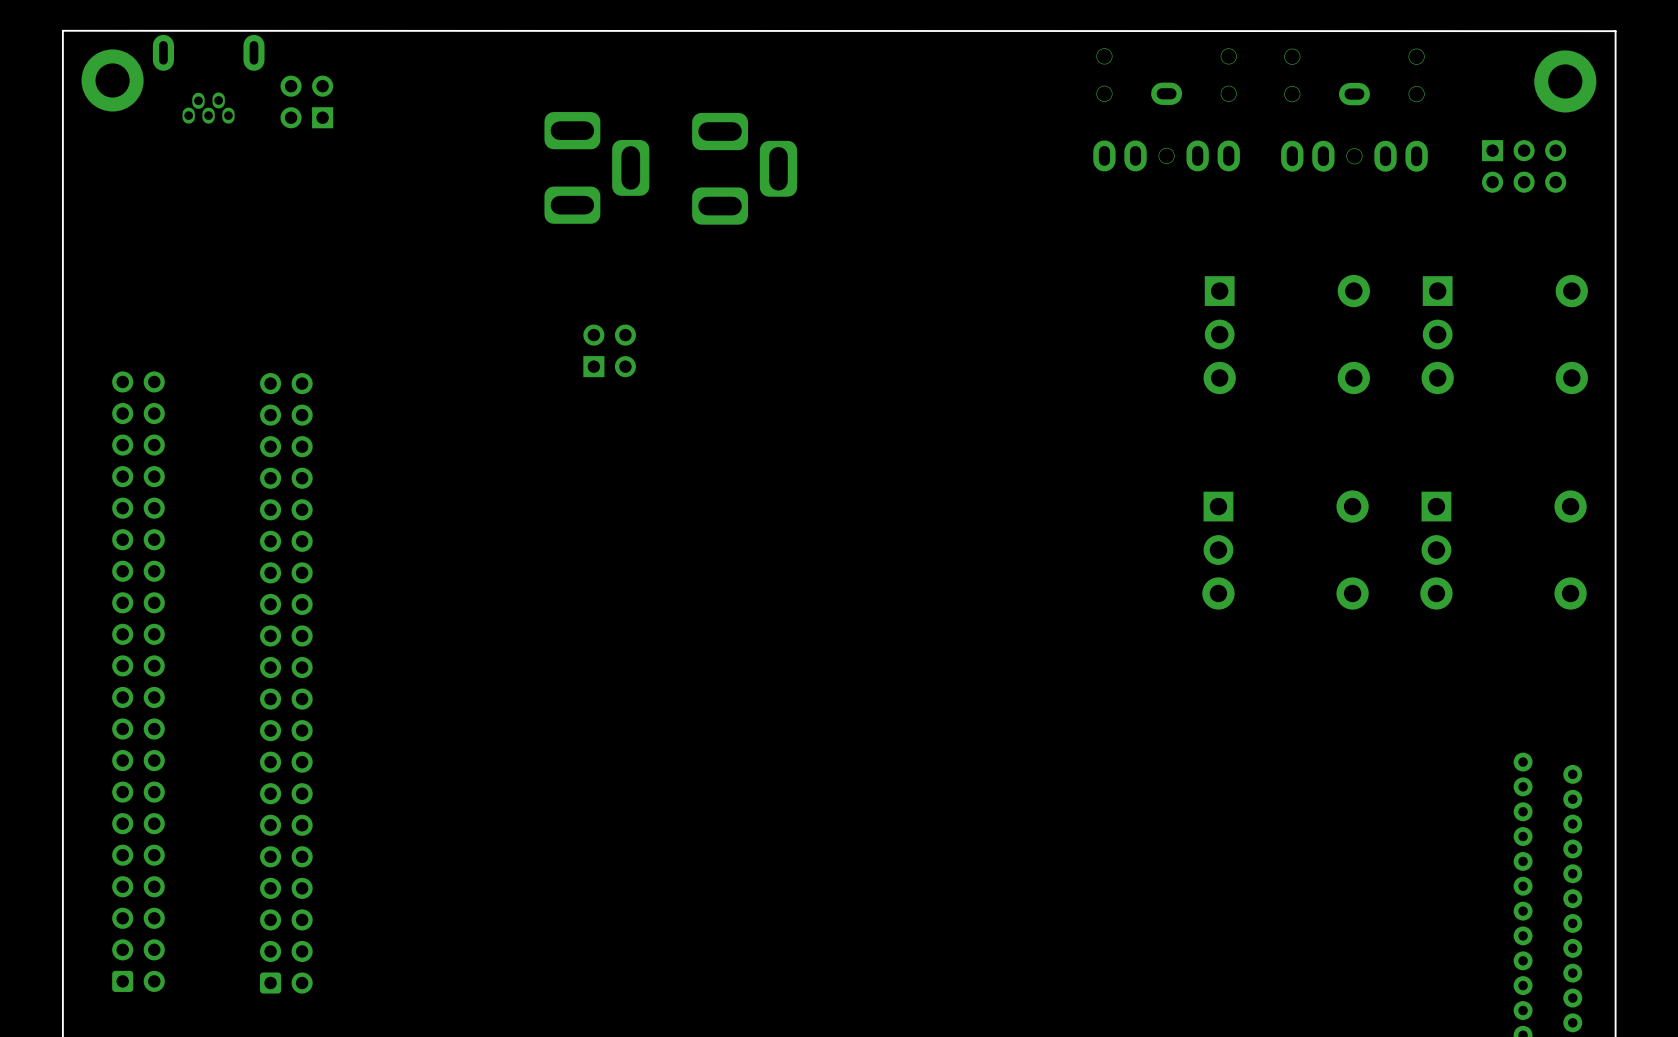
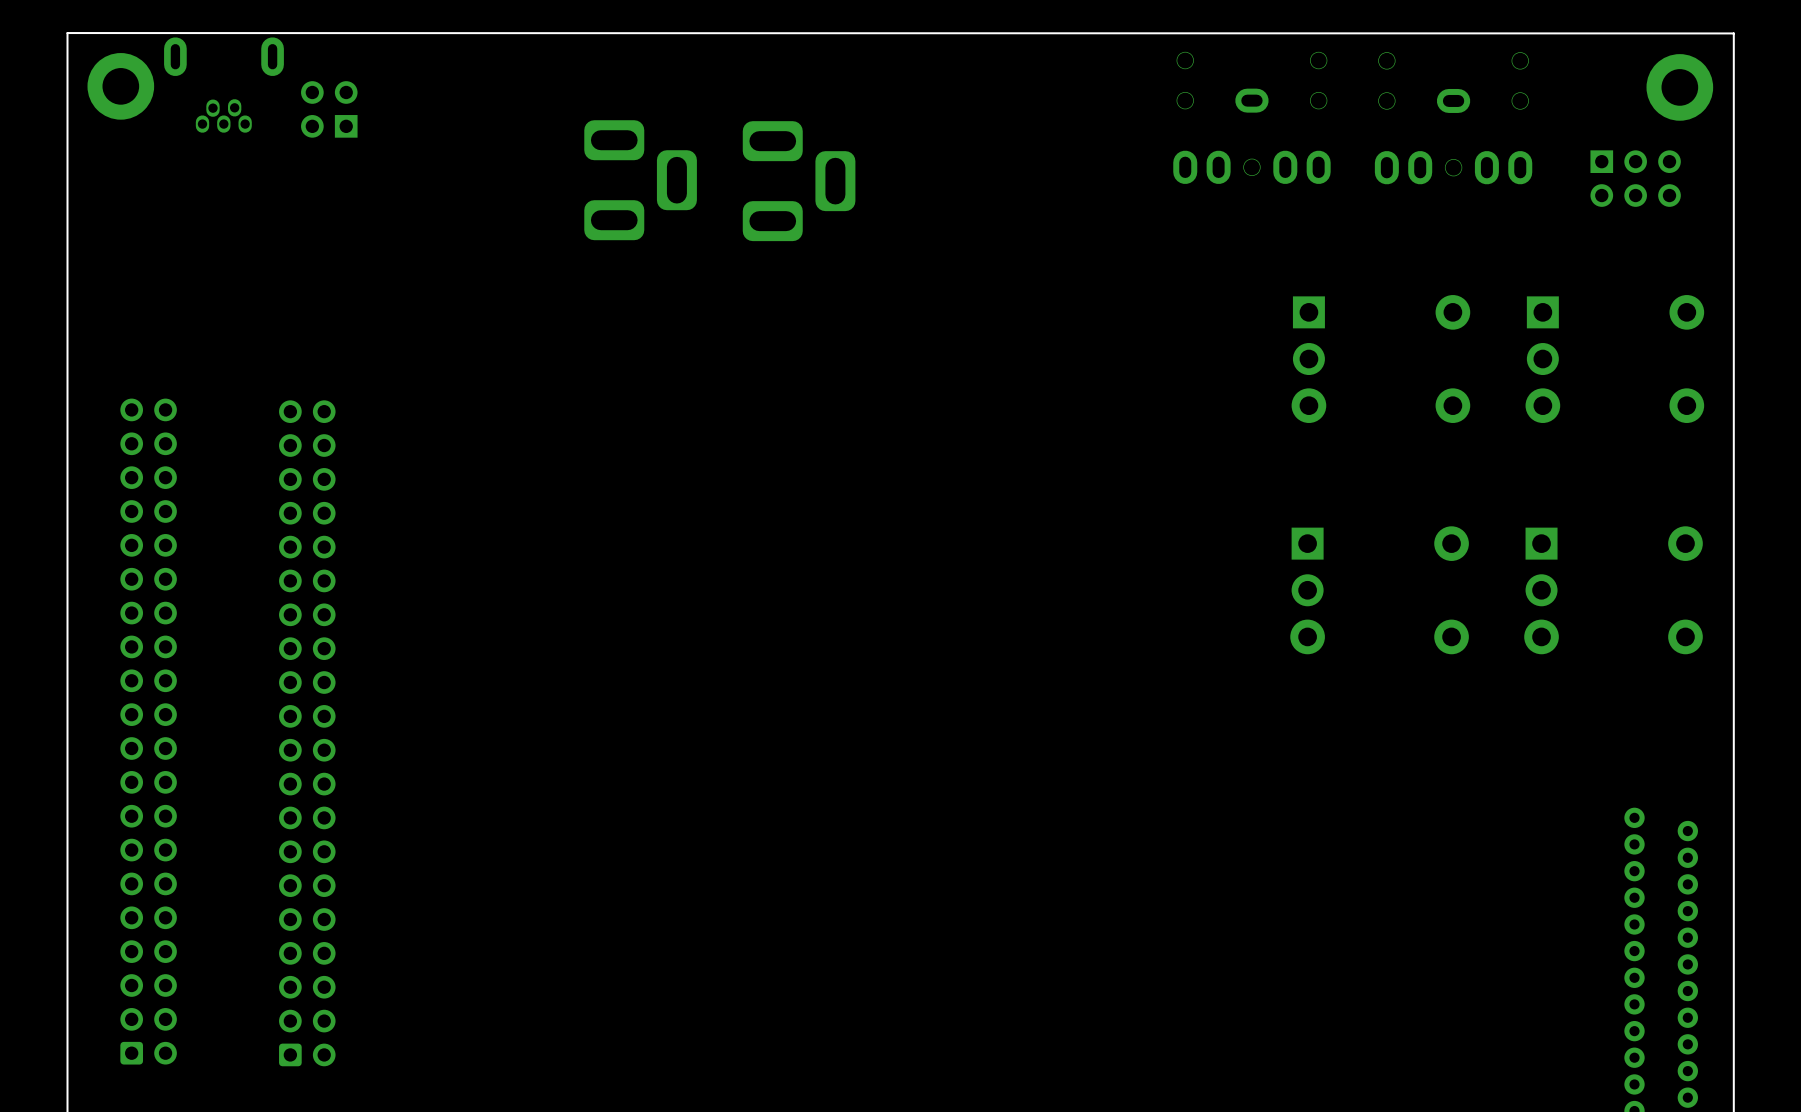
part: (609, 350) -> none

